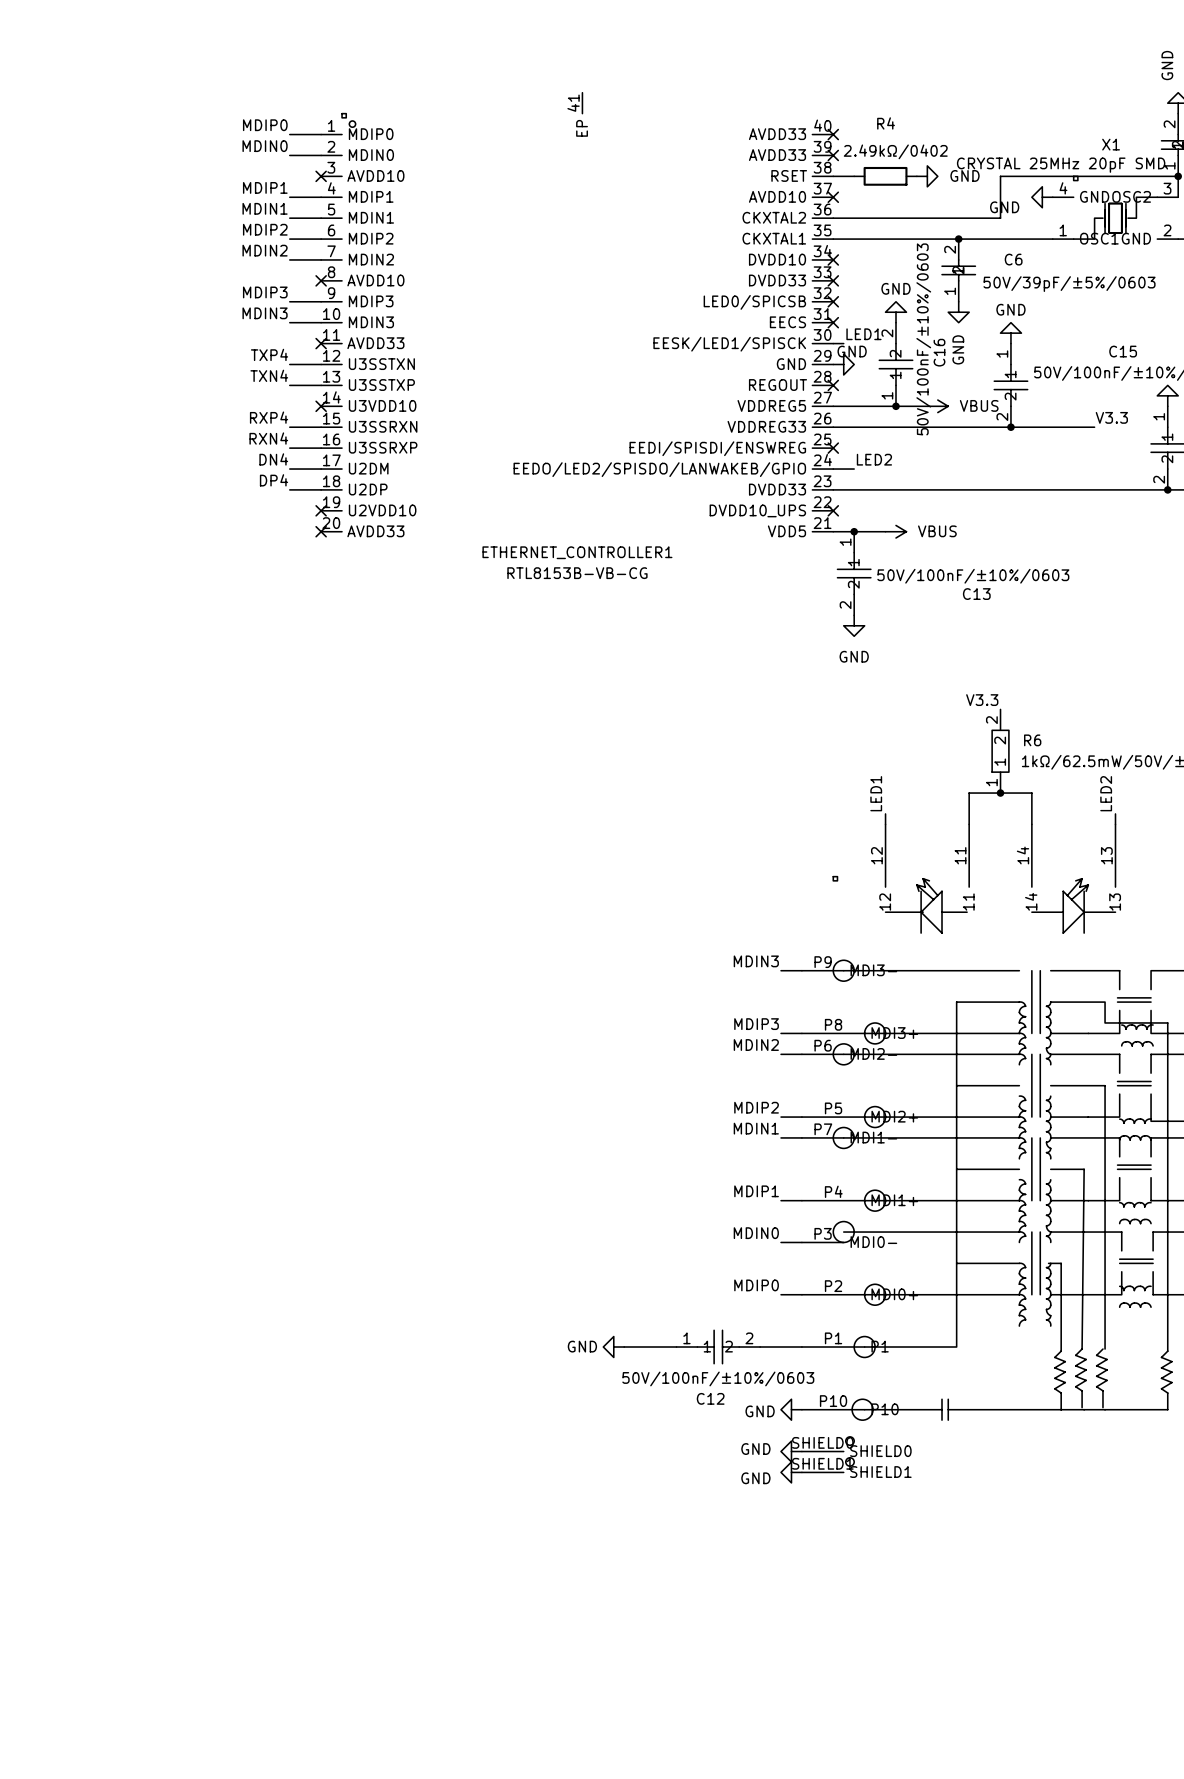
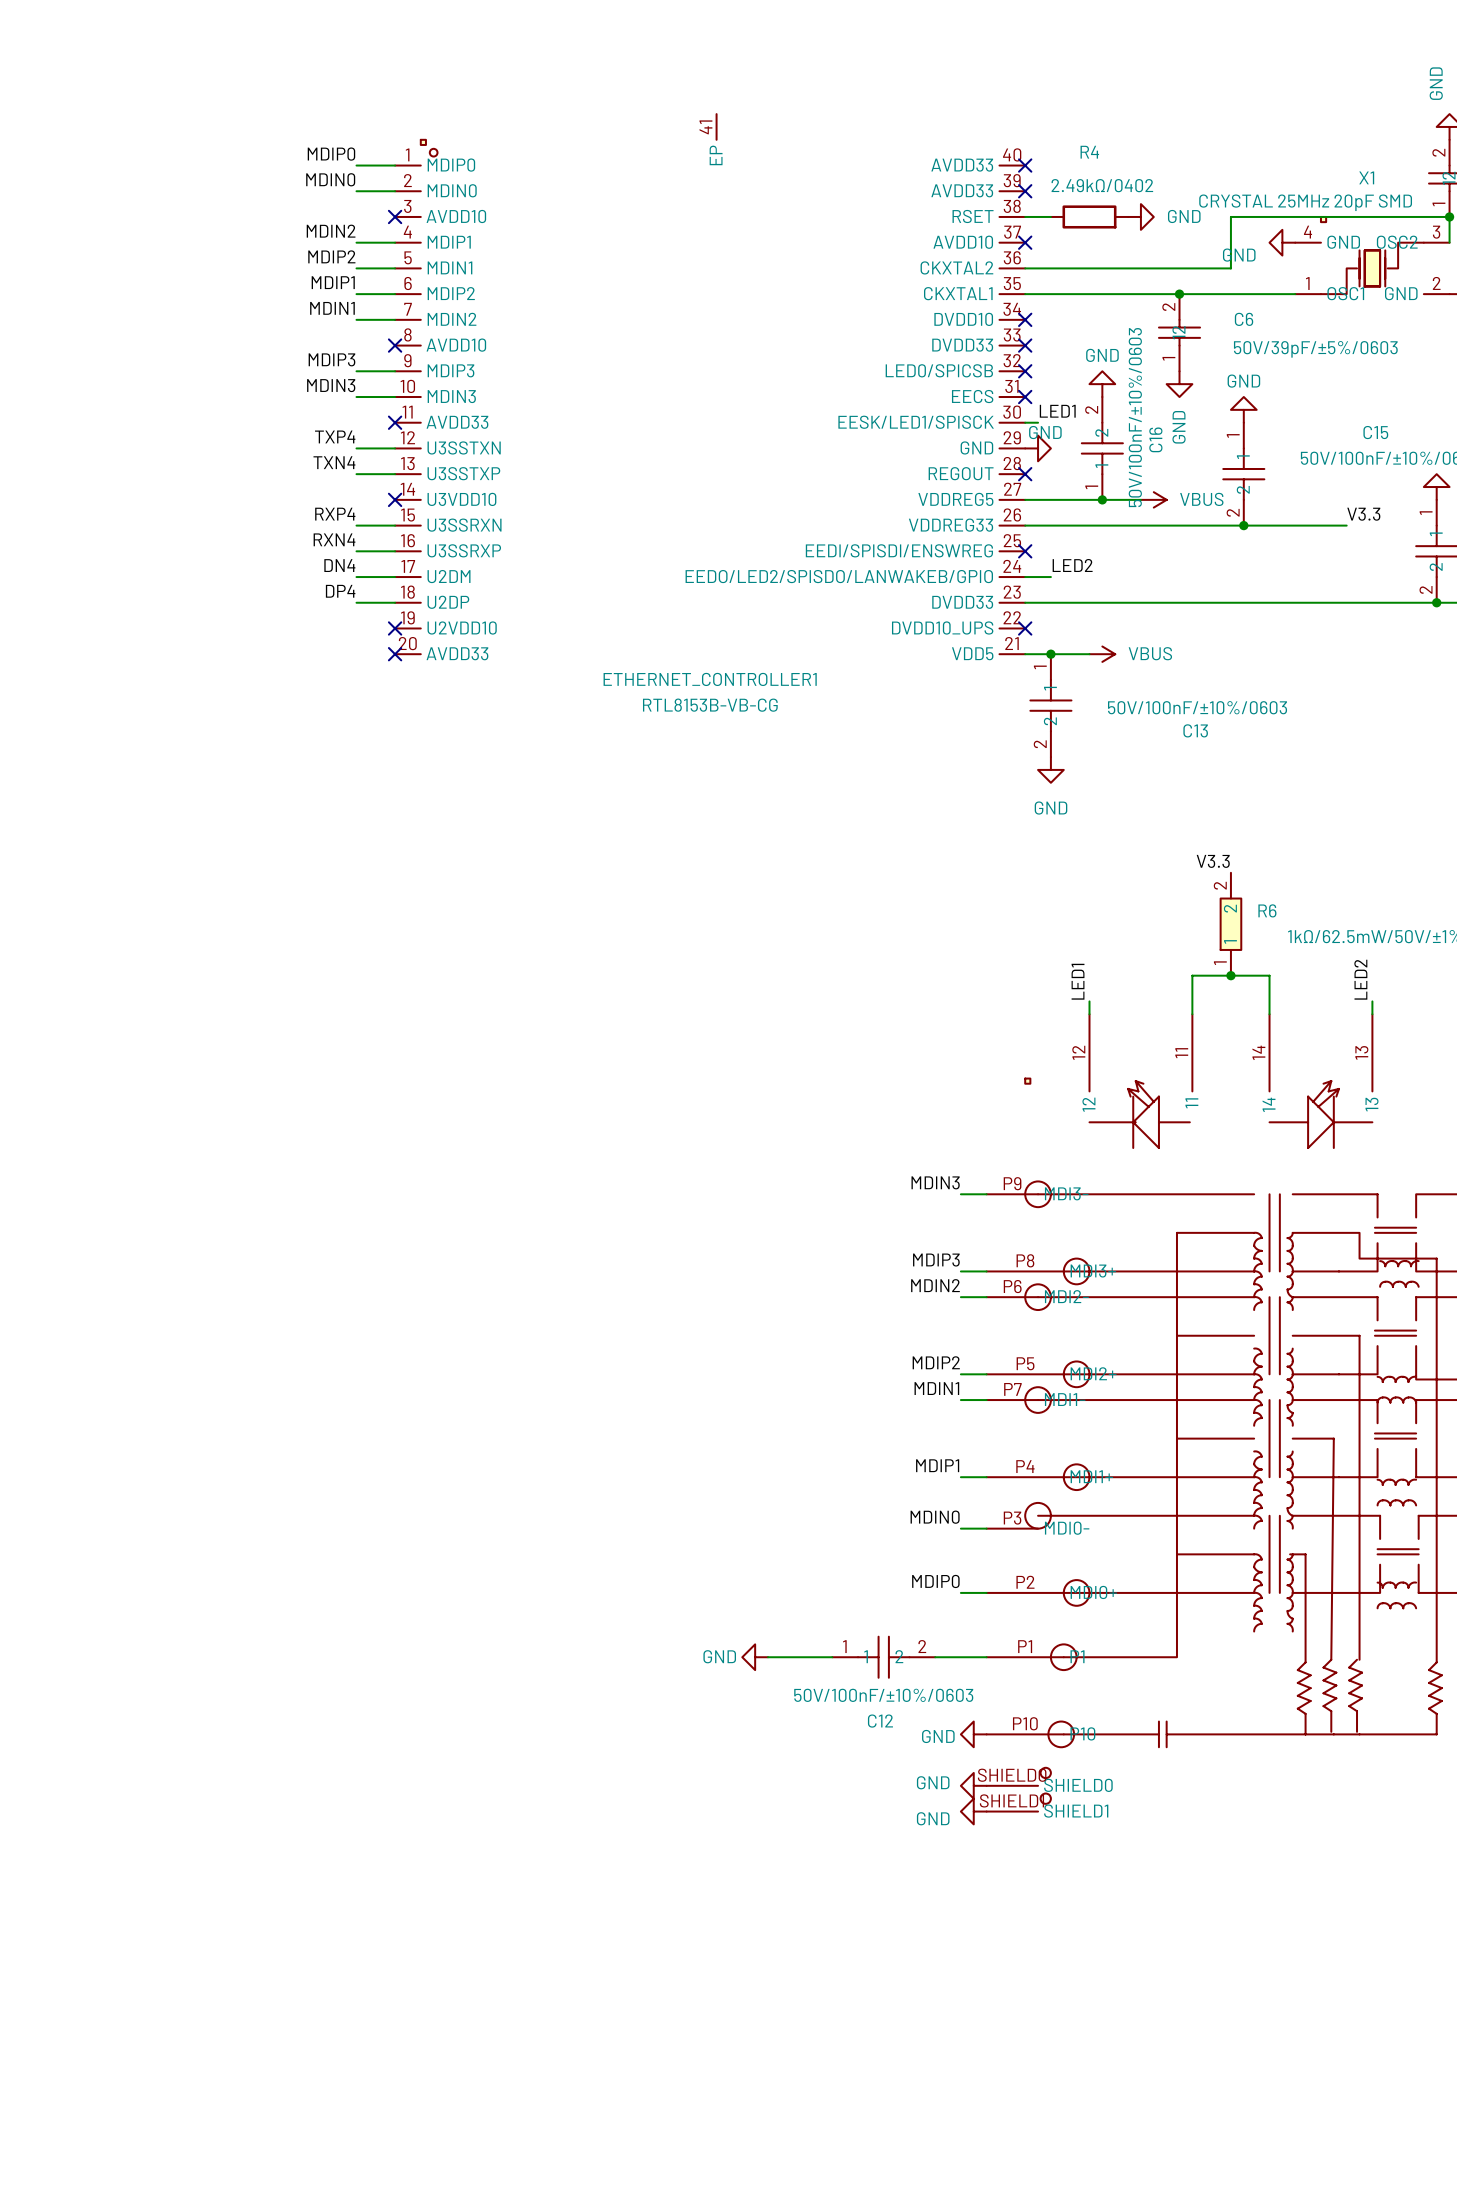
label: MDIP1 (265, 187) -> MDIN2 (331, 231)
label: MDIN1 (265, 208) -> MDIP2 (331, 256)
label: MDIP2 (265, 229) -> MDIP1 (333, 282)
label: MDIN2 (265, 250) -> MDIN1 (332, 308)

